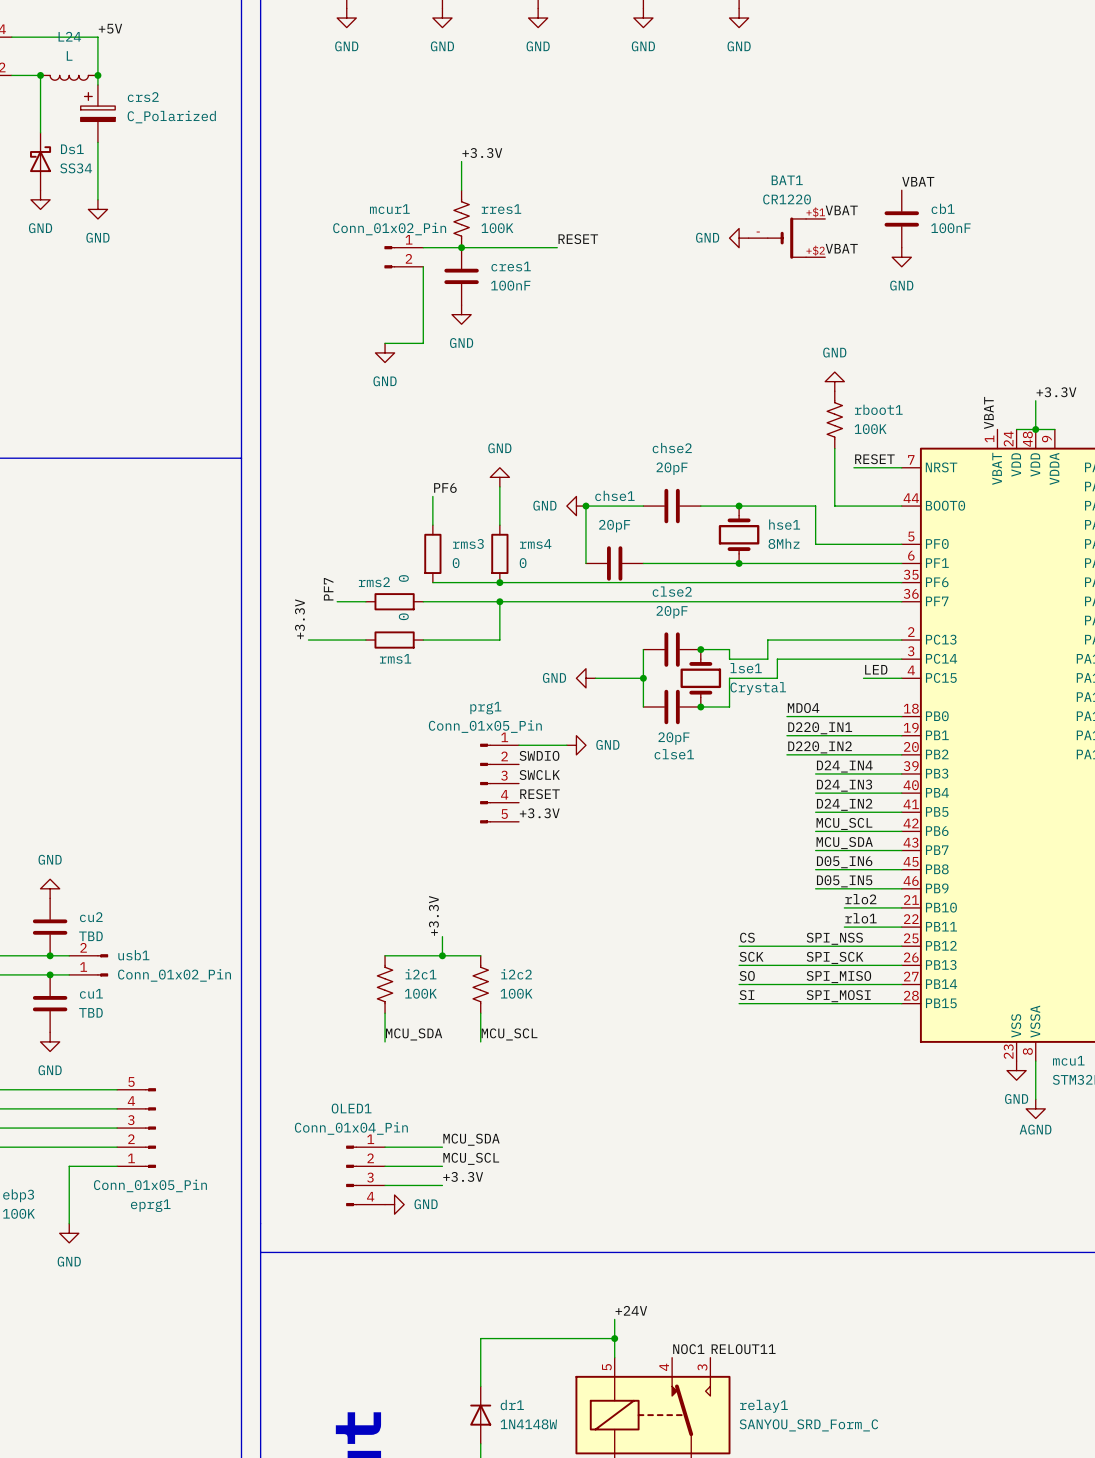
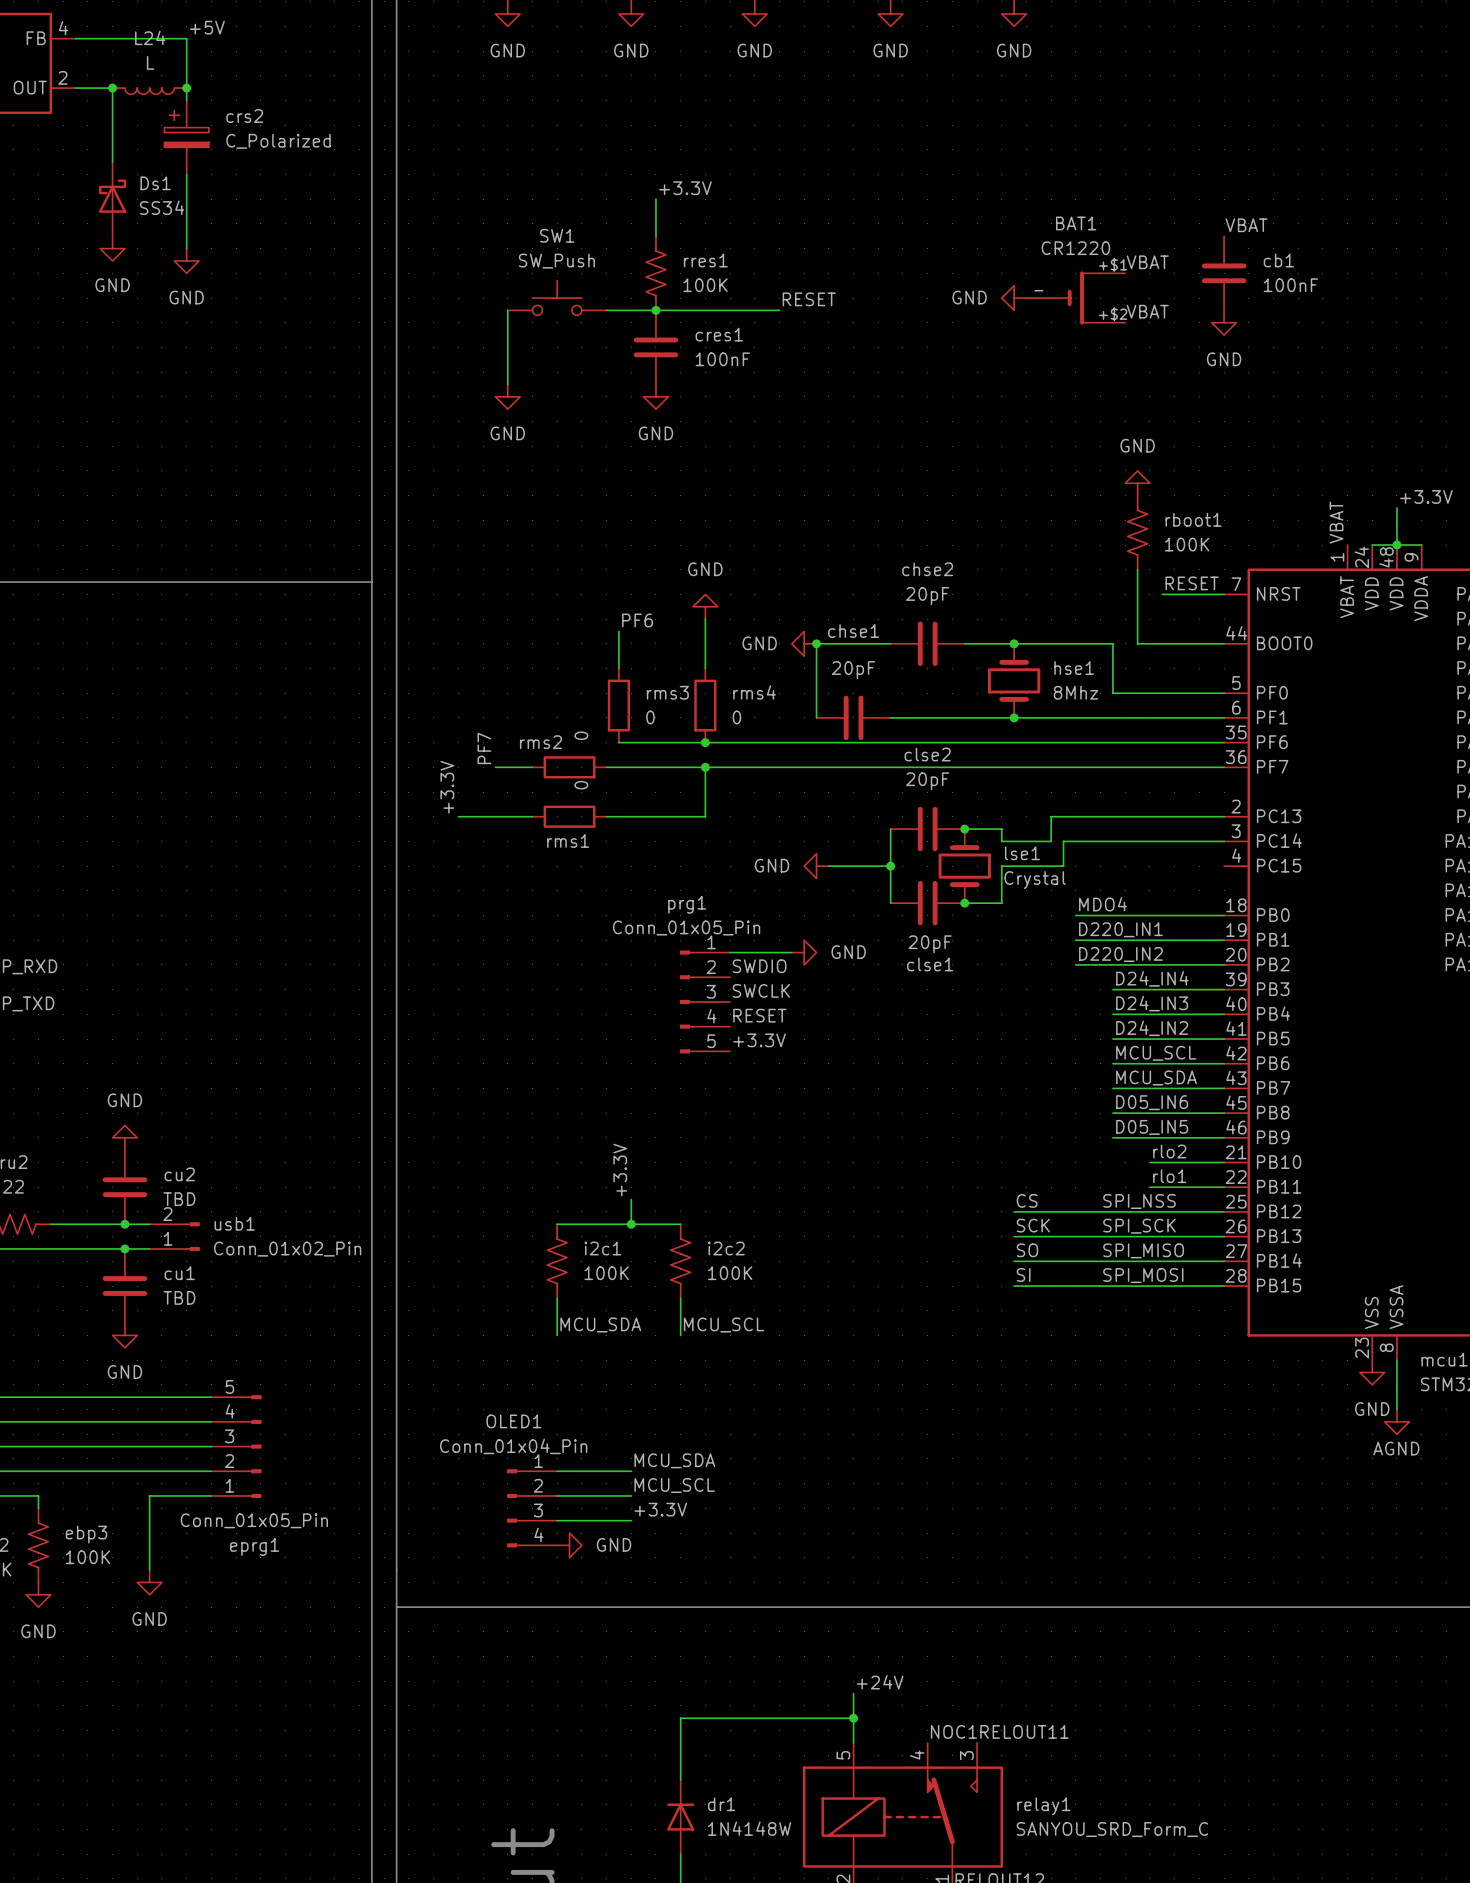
SW1: none -> SW_Push (557, 298)
wire: none -> (507, 310) (507, 384)
mcur1: Conn_01x02_Pin (403, 257) -> none
wire: (423, 266) (423, 343) (385, 343) -> none
power symbol position: GND (385, 352) -> GND (507, 396)
label: LED (876, 669) -> none
wire: (863, 678) (901, 678) -> none

